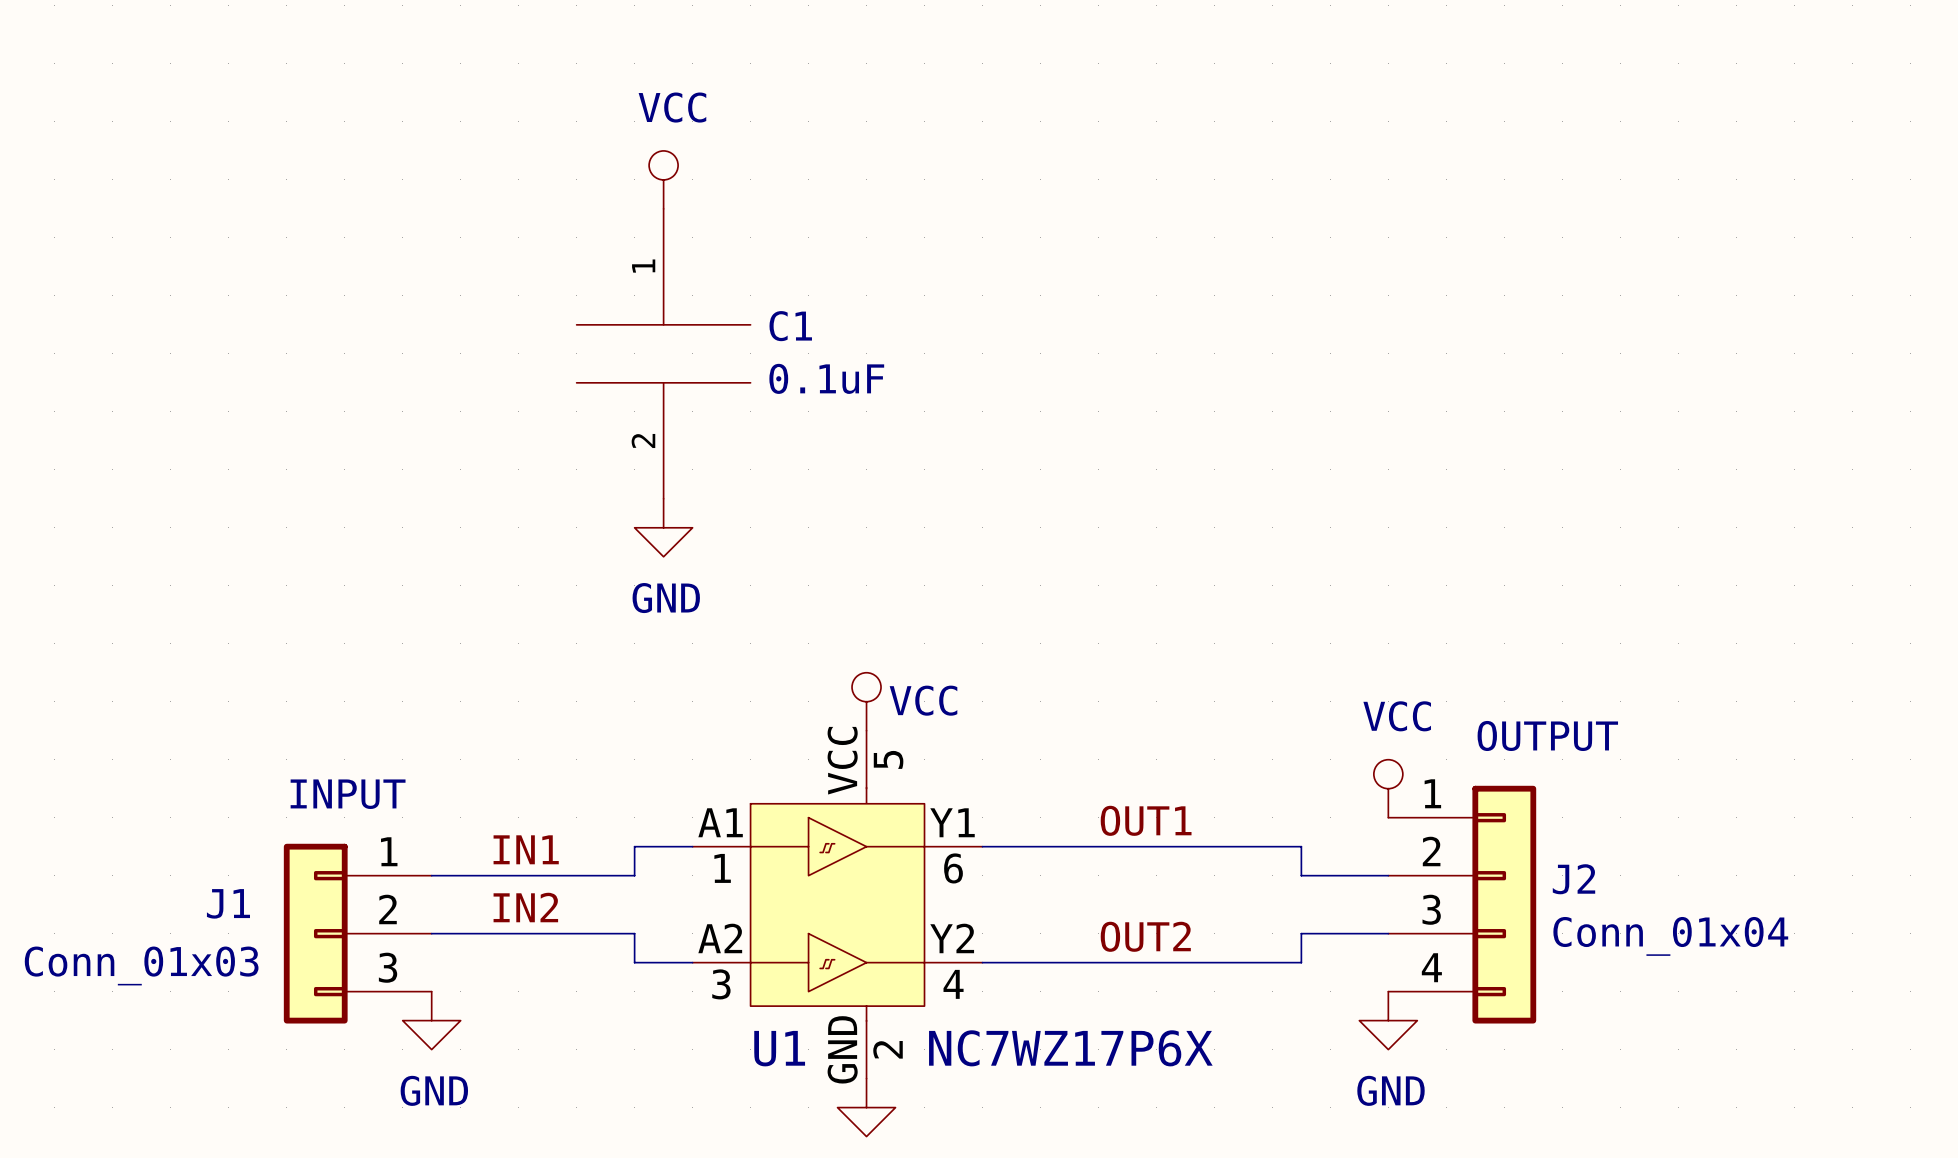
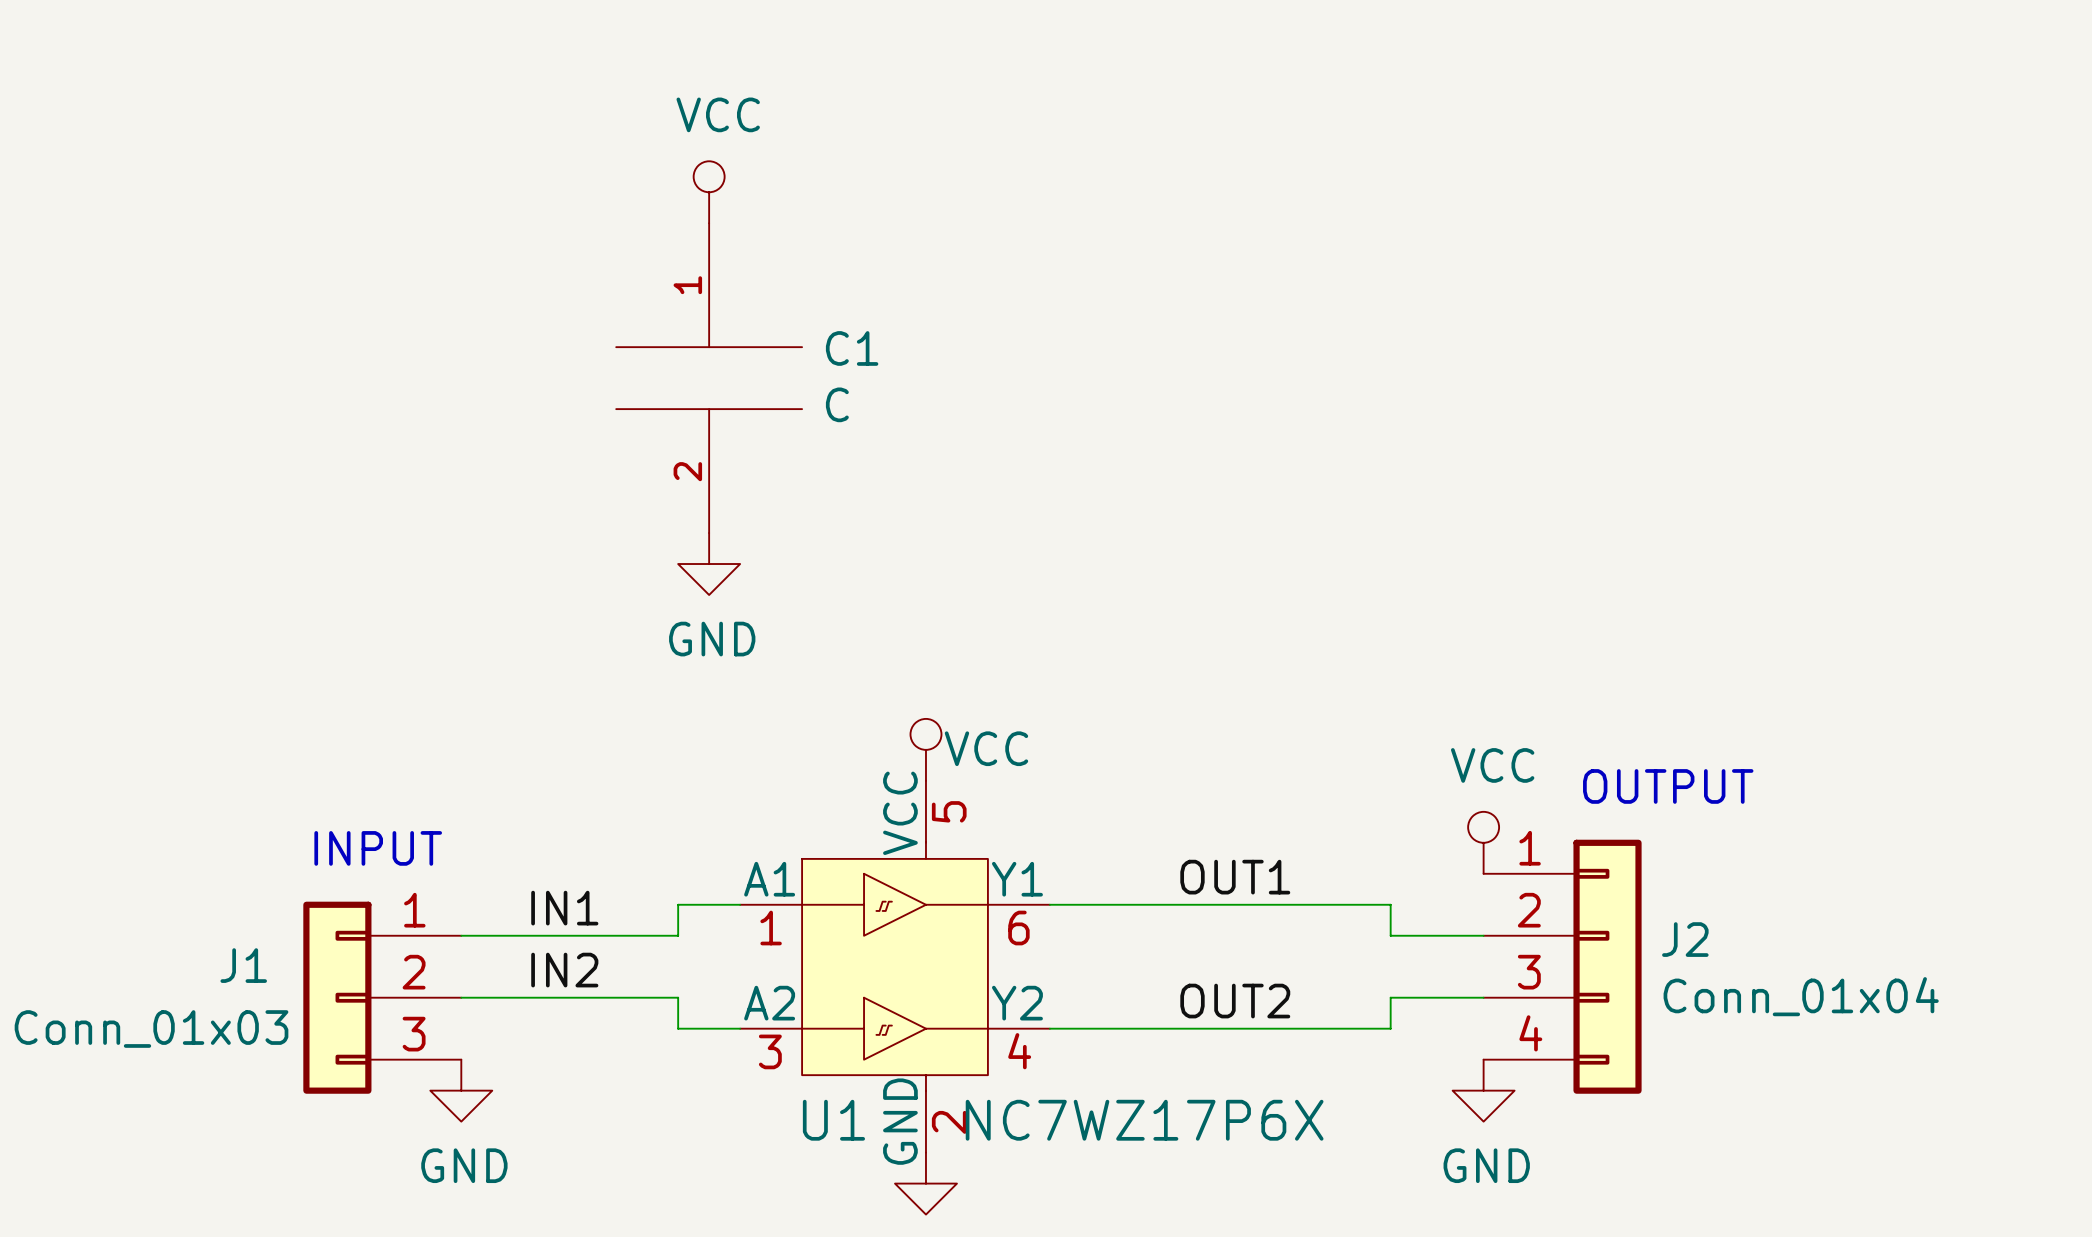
C1 value: 0.1uF (826, 378) -> C (837, 404)

